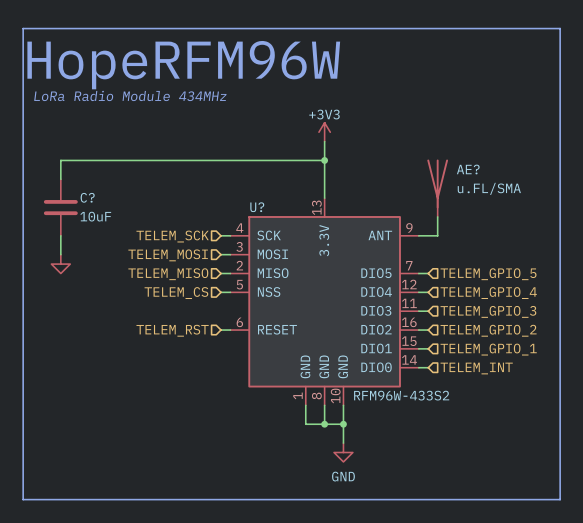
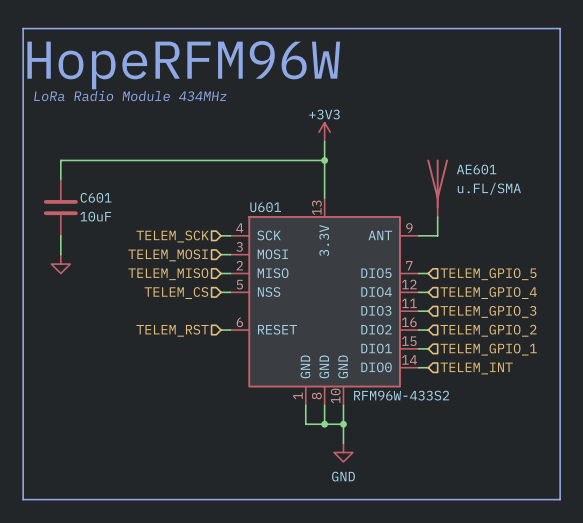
AE? name: AE? (468, 169) -> AE601 (476, 169)
C? name: C? (87, 197) -> C601 (96, 197)
U? name: U? (257, 207) -> U601 (265, 207)

